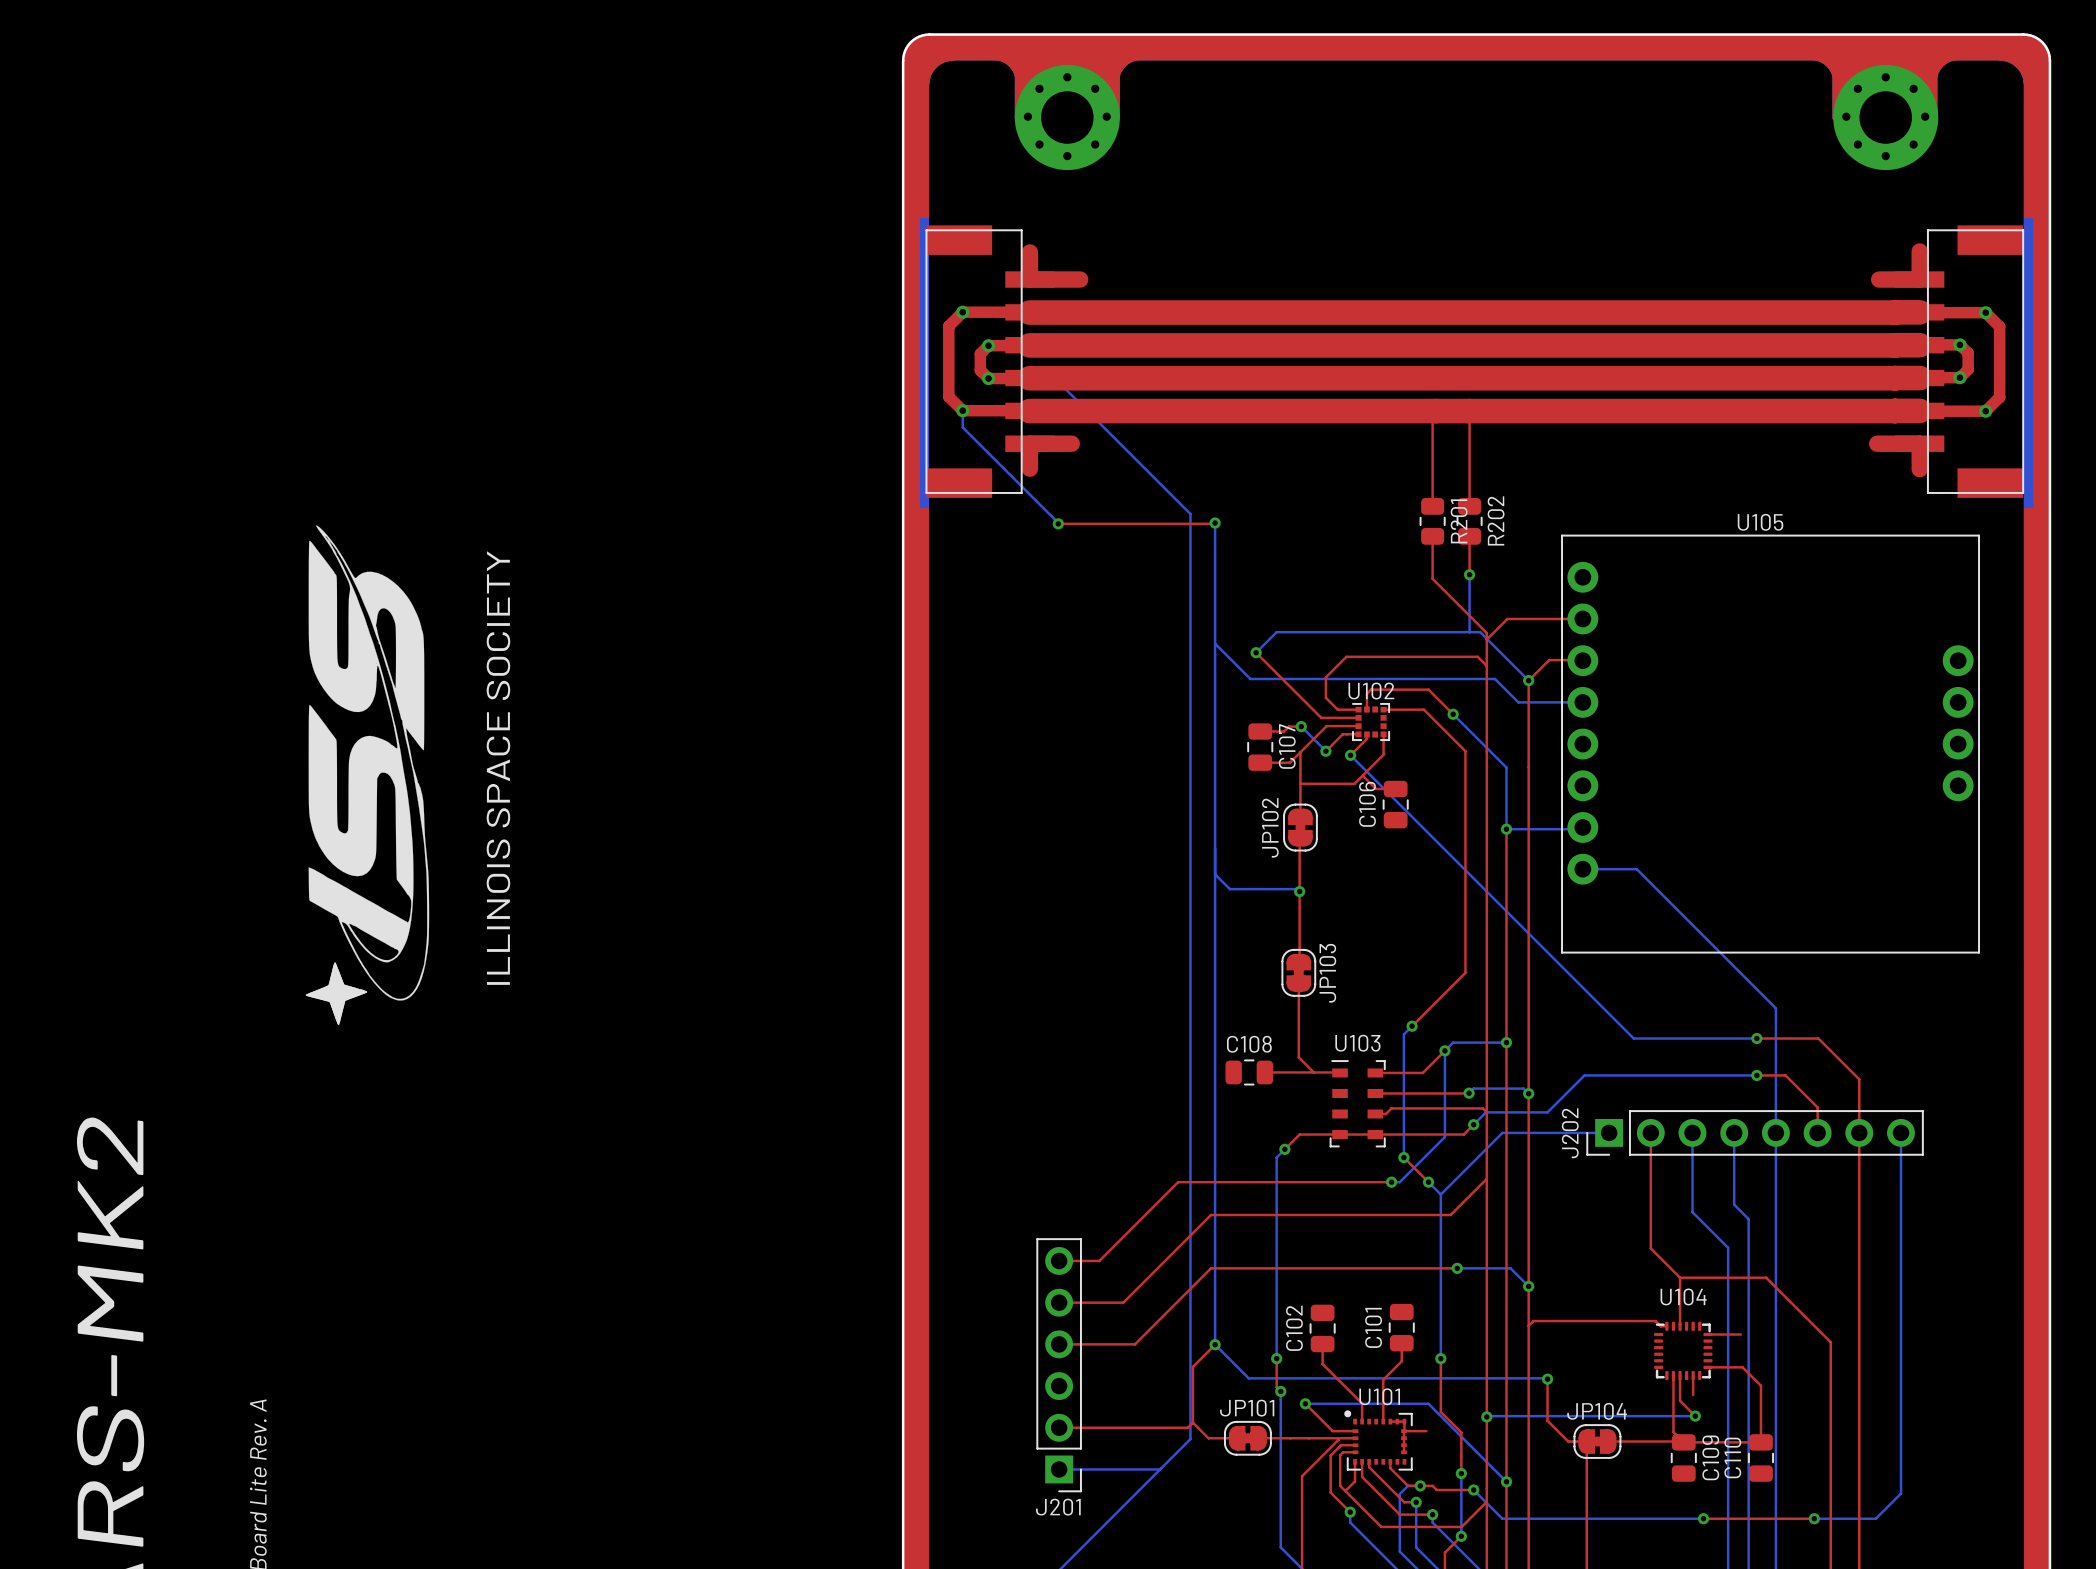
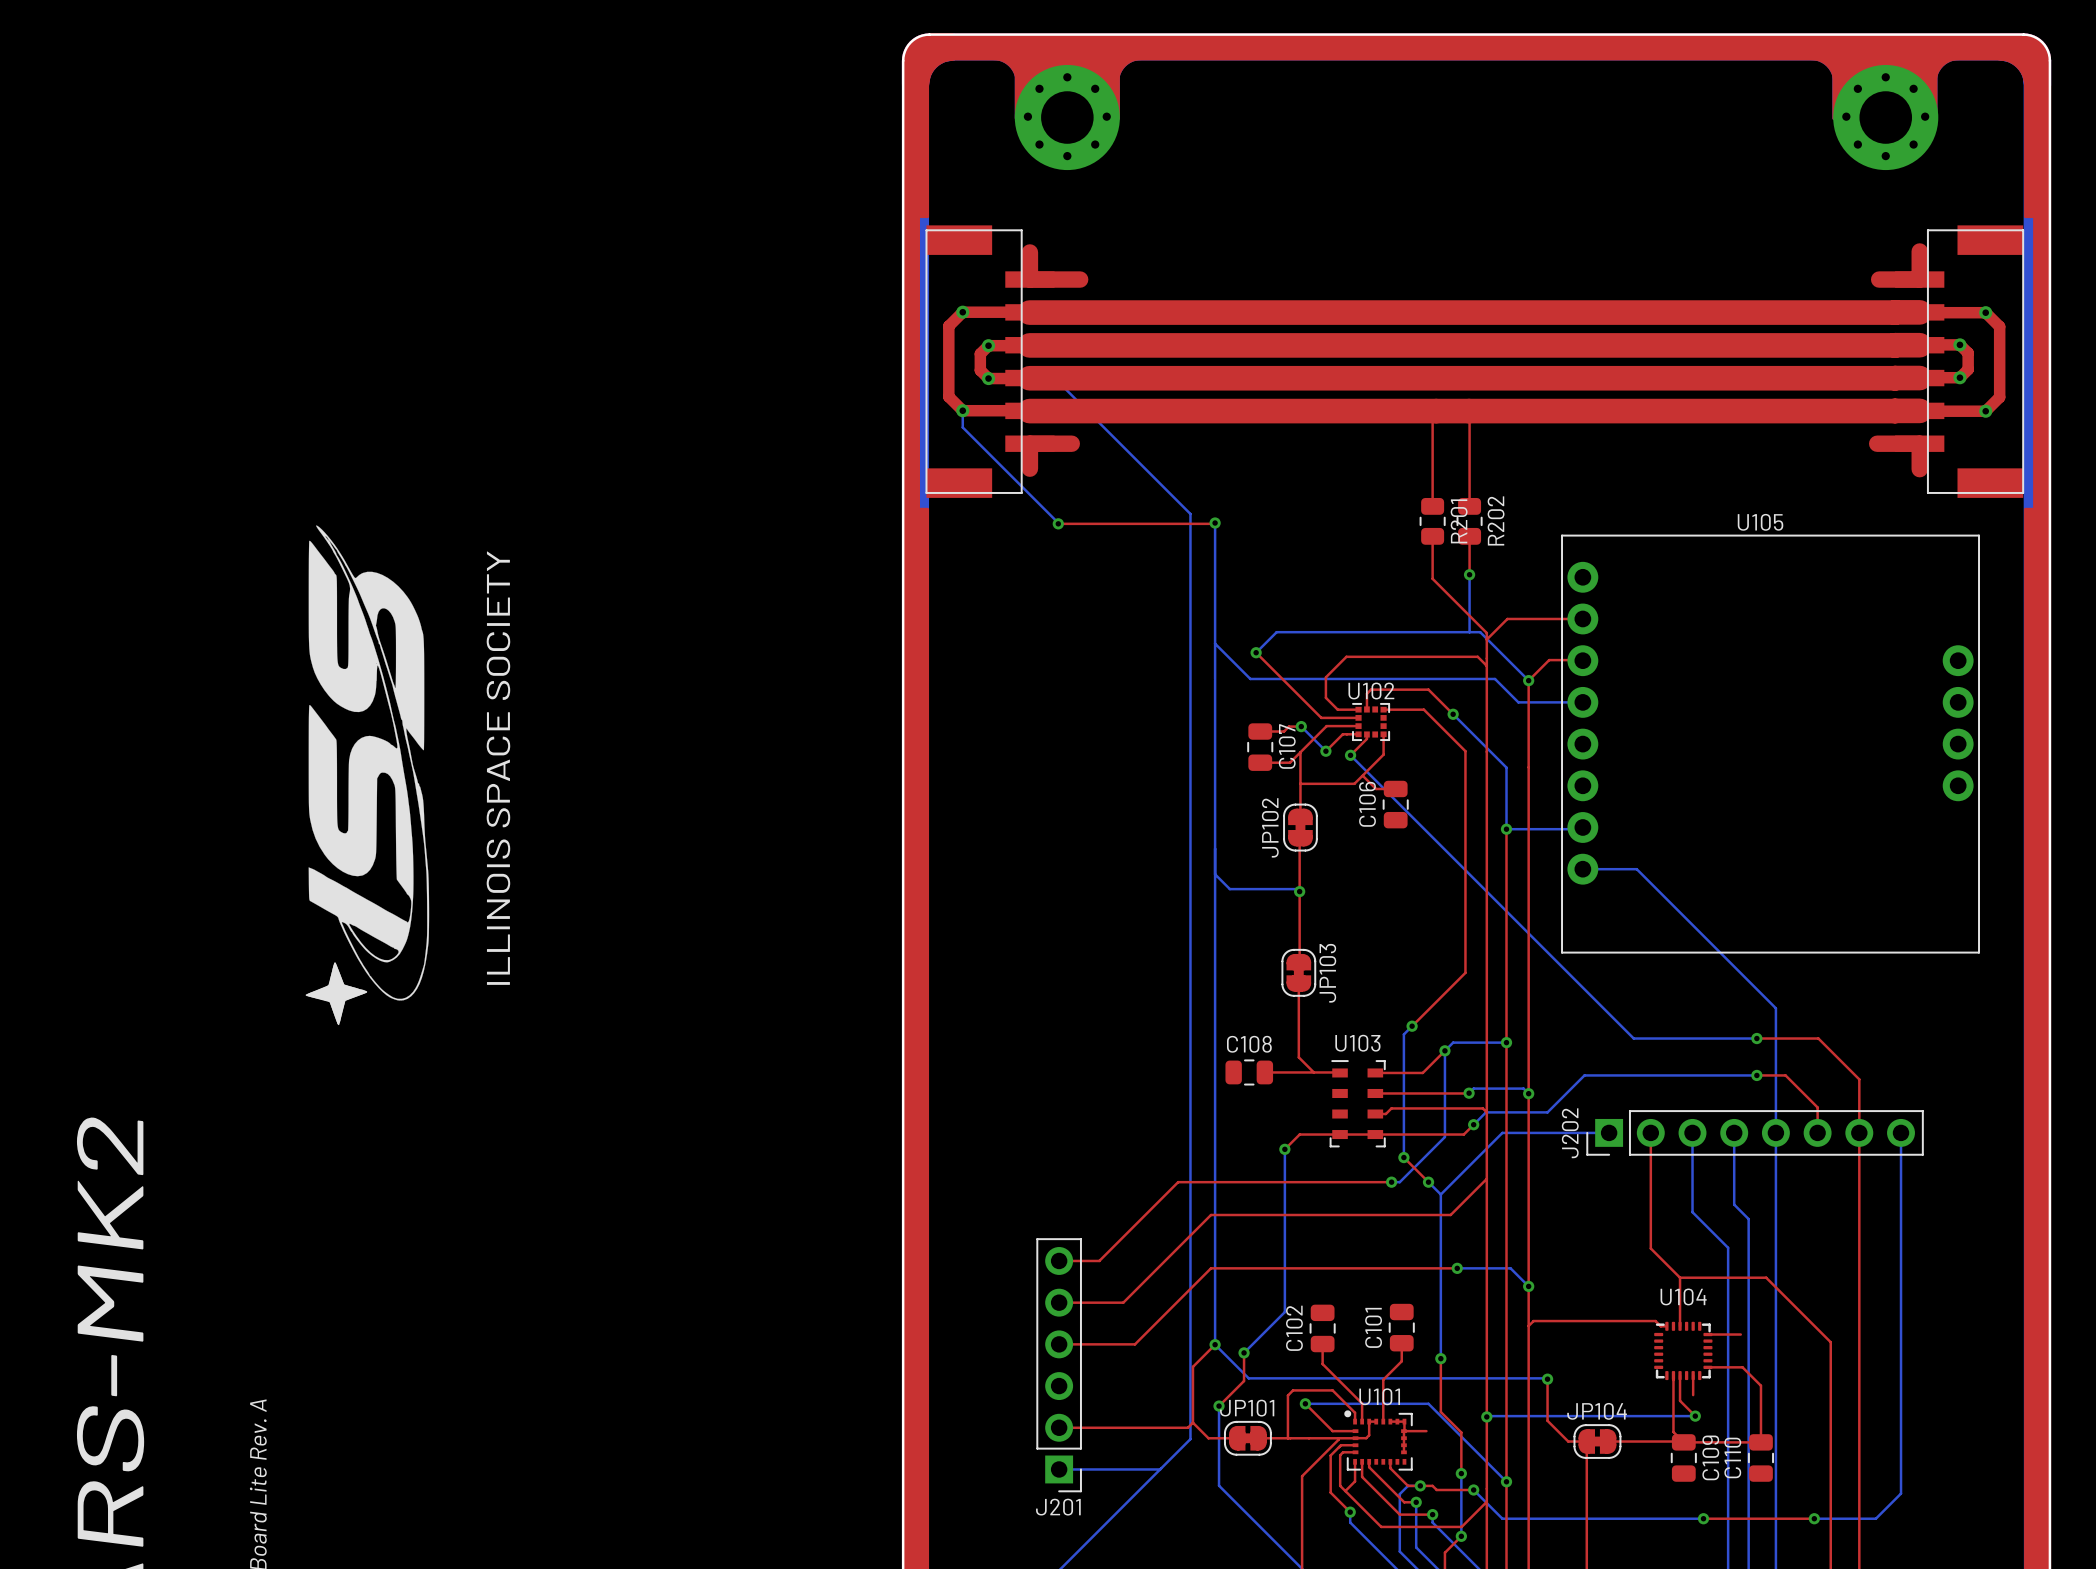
bottom track: (1284, 1149) (1276, 1157) (1276, 1358) -> (1284, 1149) (1284, 1312) (1244, 1352)
top track: none -> (1244, 1352) (1244, 1381) (1219, 1406)
via: none -> (1244, 1352)
top track: (1276, 1358) (1276, 1387) (1280, 1391) -> none
via: (1276, 1358) -> none
bottom track: (1280, 1391) (1280, 1547) -> (1219, 1406) (1219, 1485) (1280, 1547)
via: (1280, 1391) -> none
via: none -> (1219, 1406)
top track: none -> (1355, 1421) (1355, 1412) (1332, 1390) (1293, 1390) (1287, 1395) (1287, 1438)
top track: none -> (1376, 1421) (1369, 1421) (1369, 1435) (1366, 1438) (1355, 1438)

